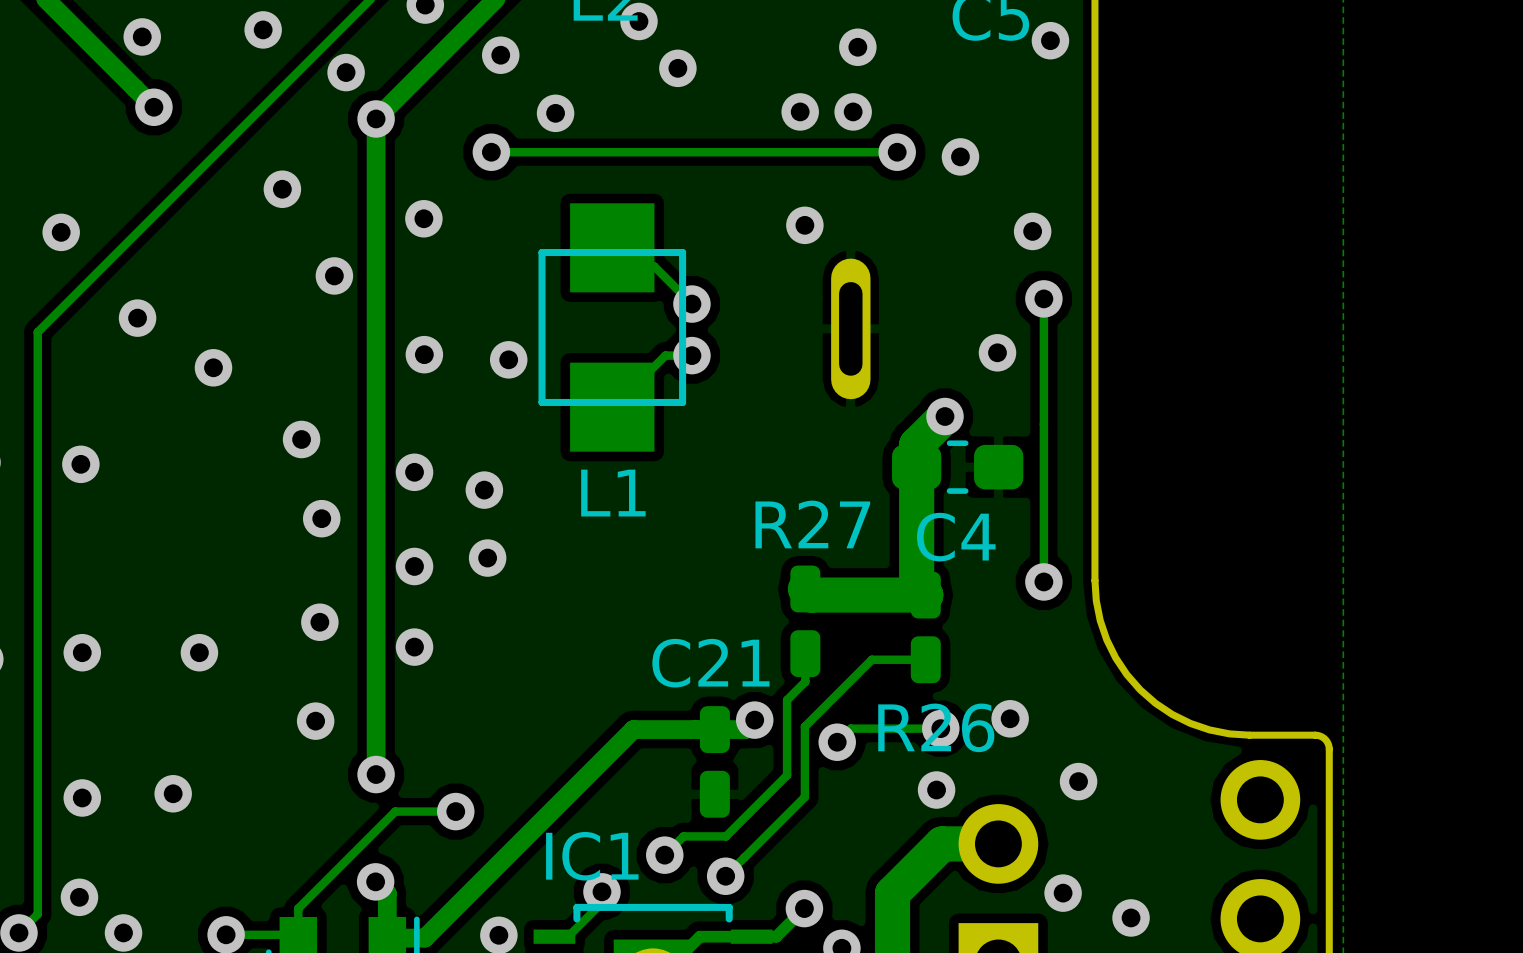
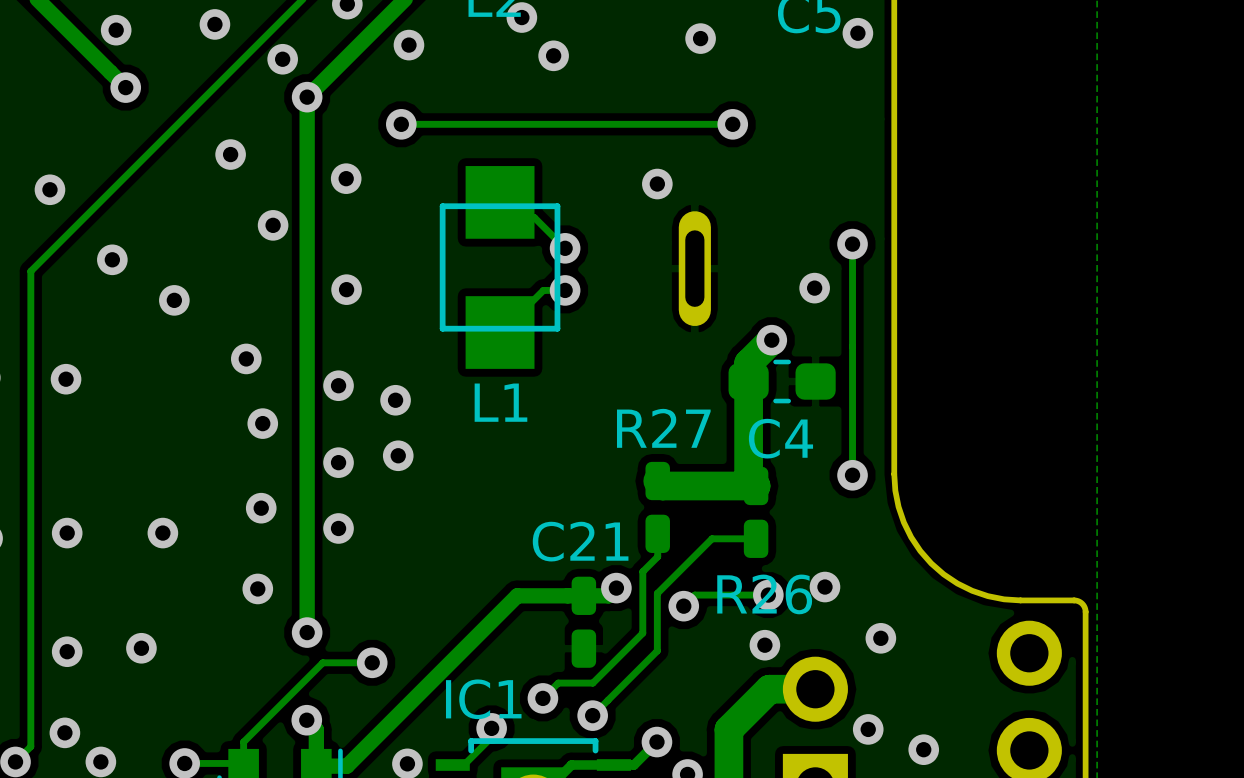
via: (800, 111) -> none
via: (853, 111) -> none
via: (555, 113) -> none
via: (960, 156) -> none
via: (1032, 231) -> none
via: (508, 359) -> none

